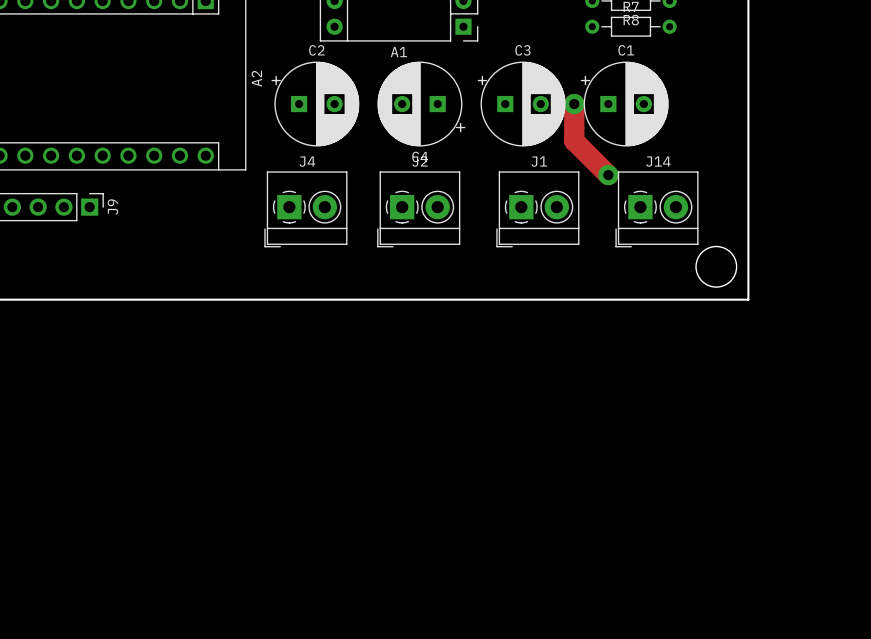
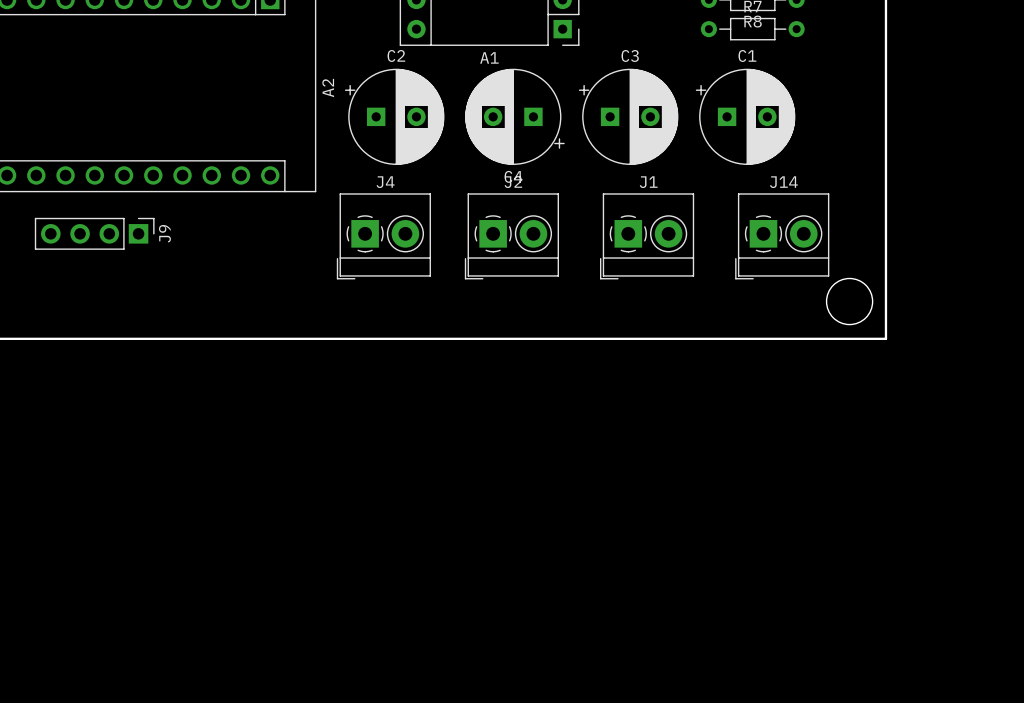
track: (574, 104) (574, 141) (608, 175) -> none
via: (574, 104) -> none
via: (608, 175) -> none

